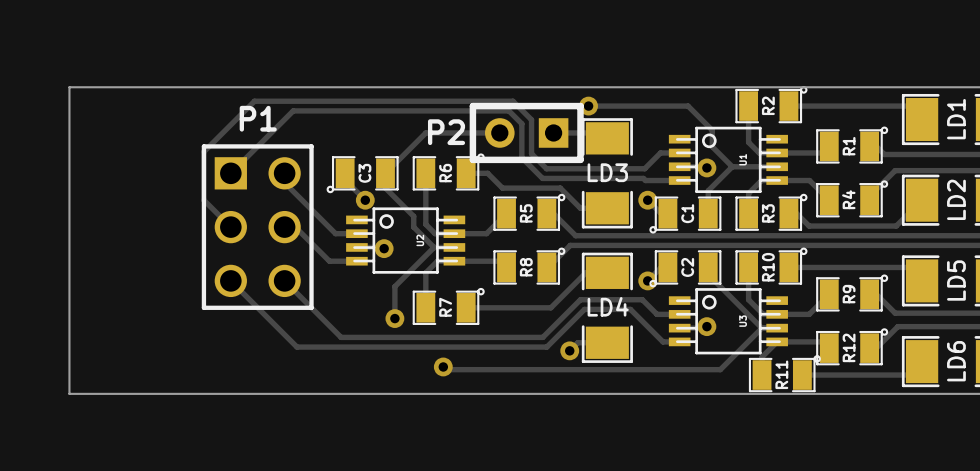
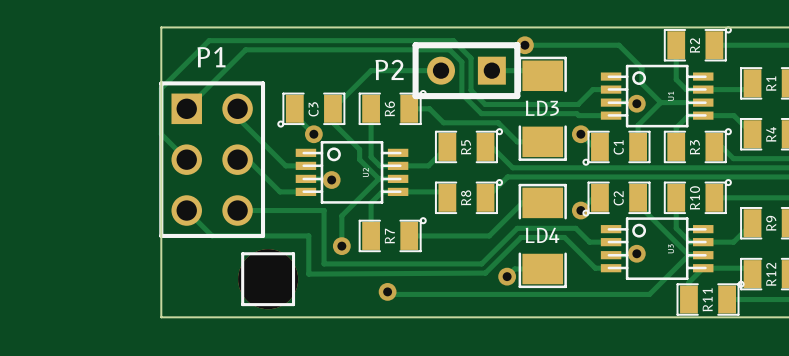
board edge: (203, 87) (69, 87) (69, 393) (203, 393) -> (161, 27) (161, 317)
track: (284, 280) (341, 337) (376, 337) -> (237, 210) (324, 210) (324, 263)
track: (257, 307) (297, 347) (546, 347) -> (212, 235) (308, 235) (308, 274) (485, 273)
part: none -> (268, 279)

